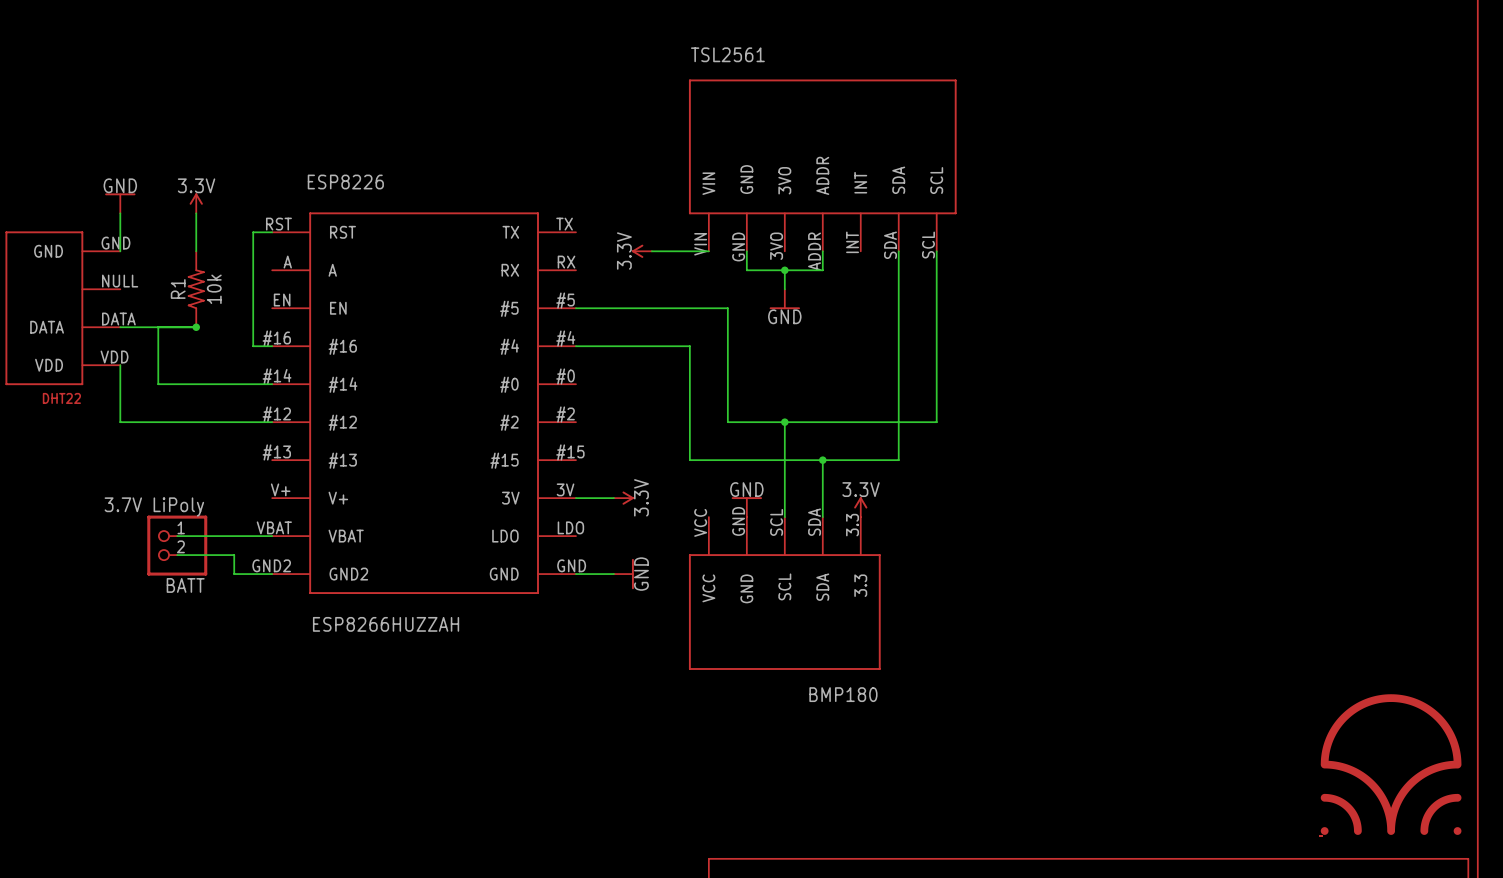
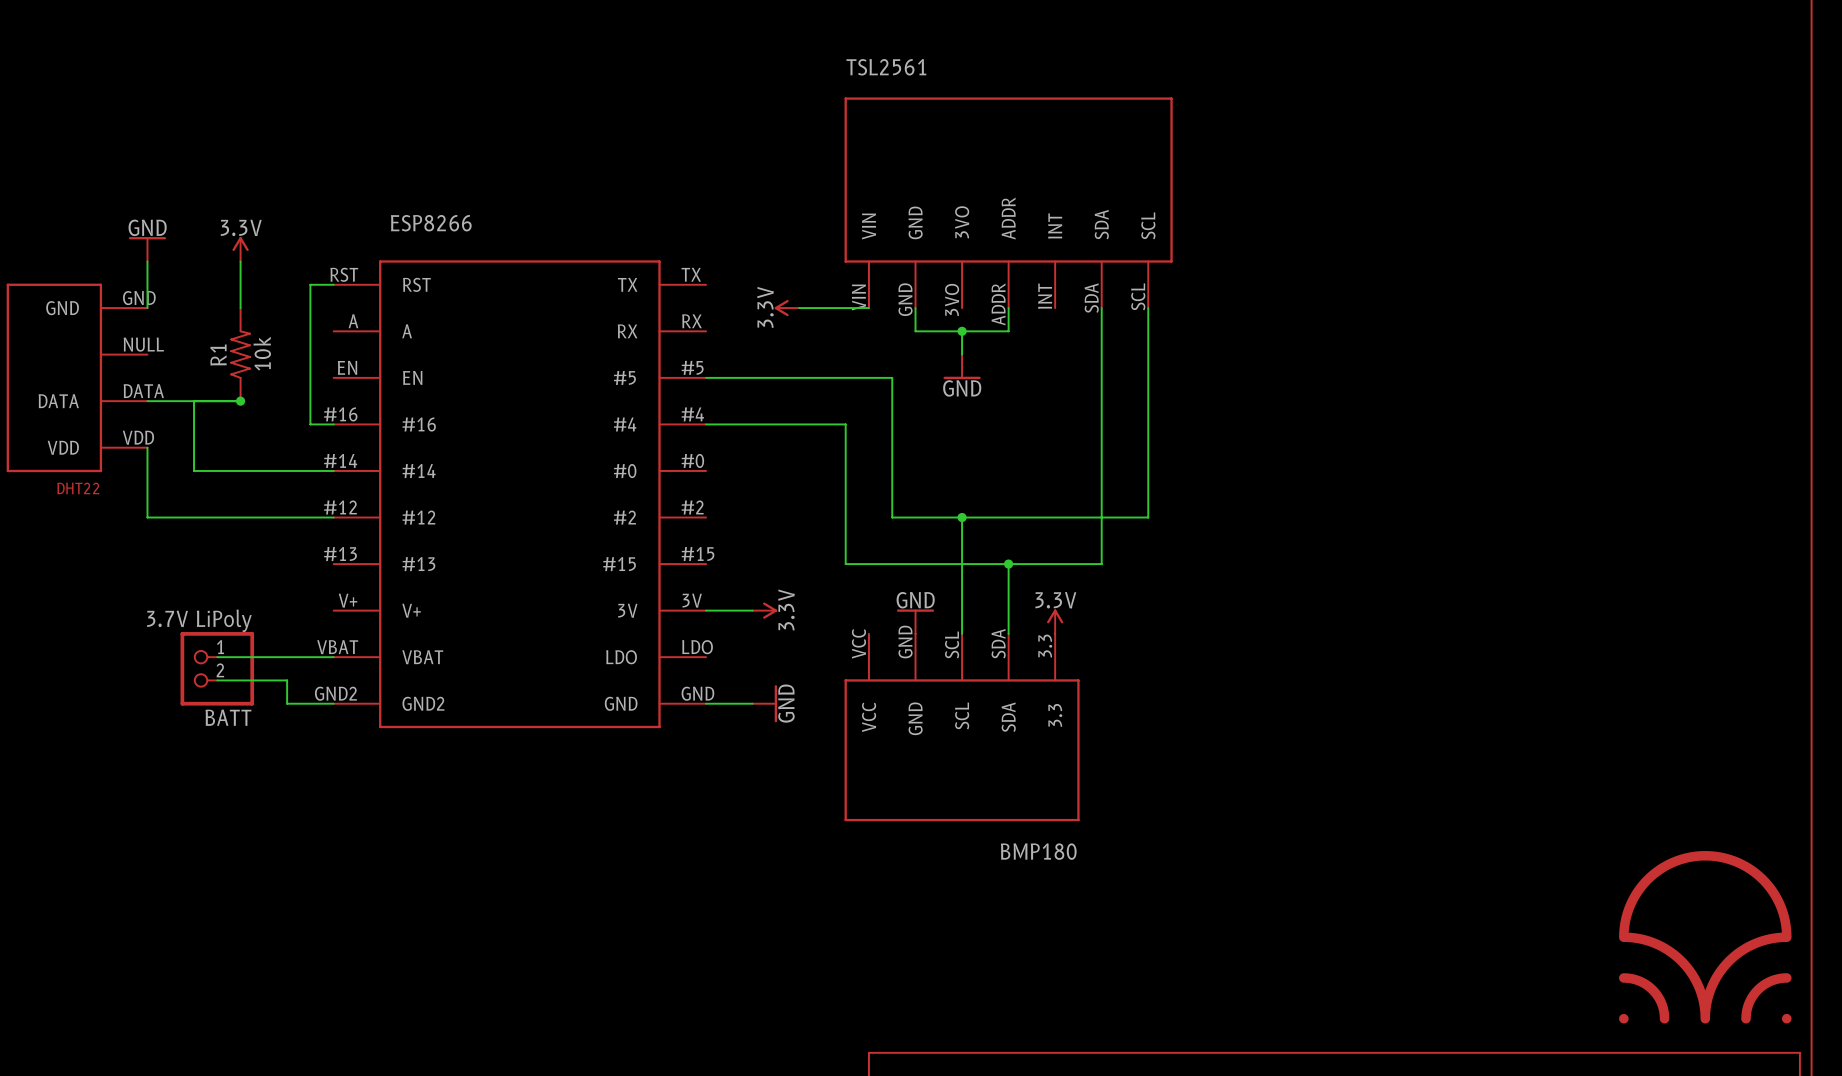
ESP8226 name: ESP8226 (345, 182) -> ESP8266 (431, 223)
ESP8226 value: ESP8266HUZZAH (386, 624) -> none

